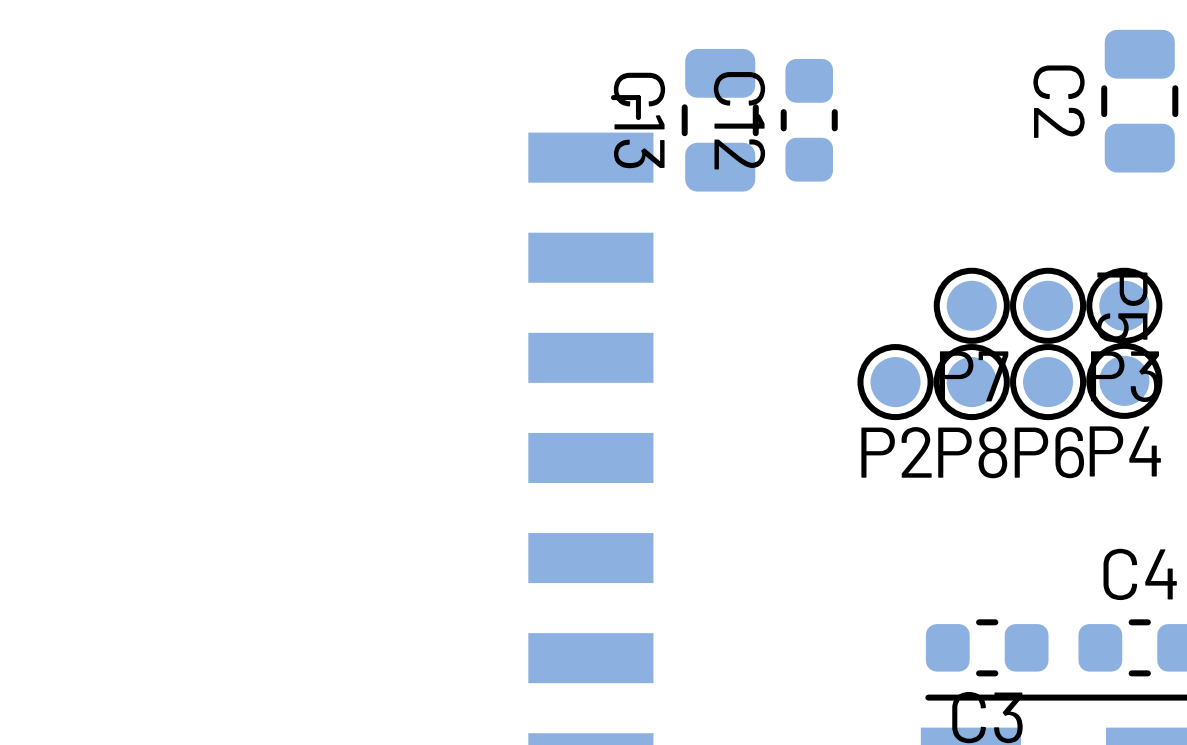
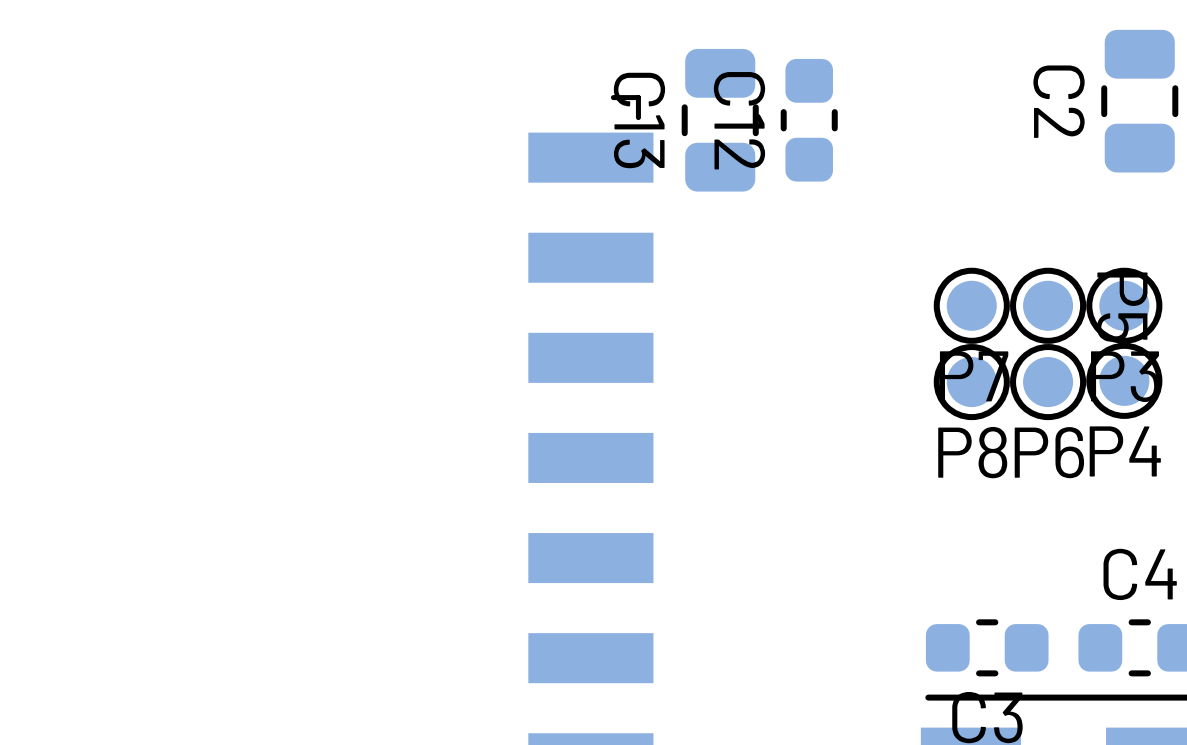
P2: (895, 382) -> none

